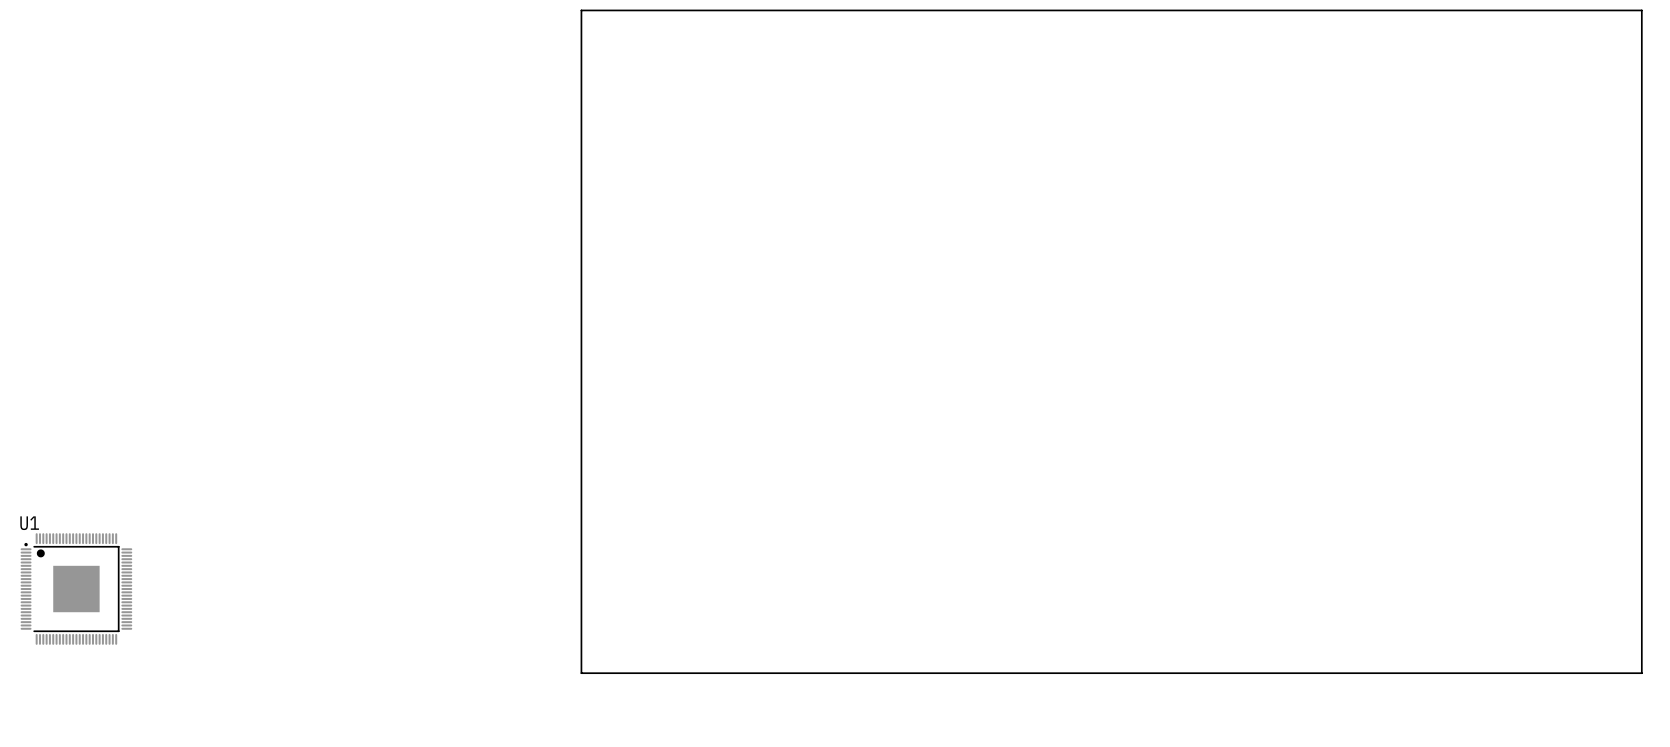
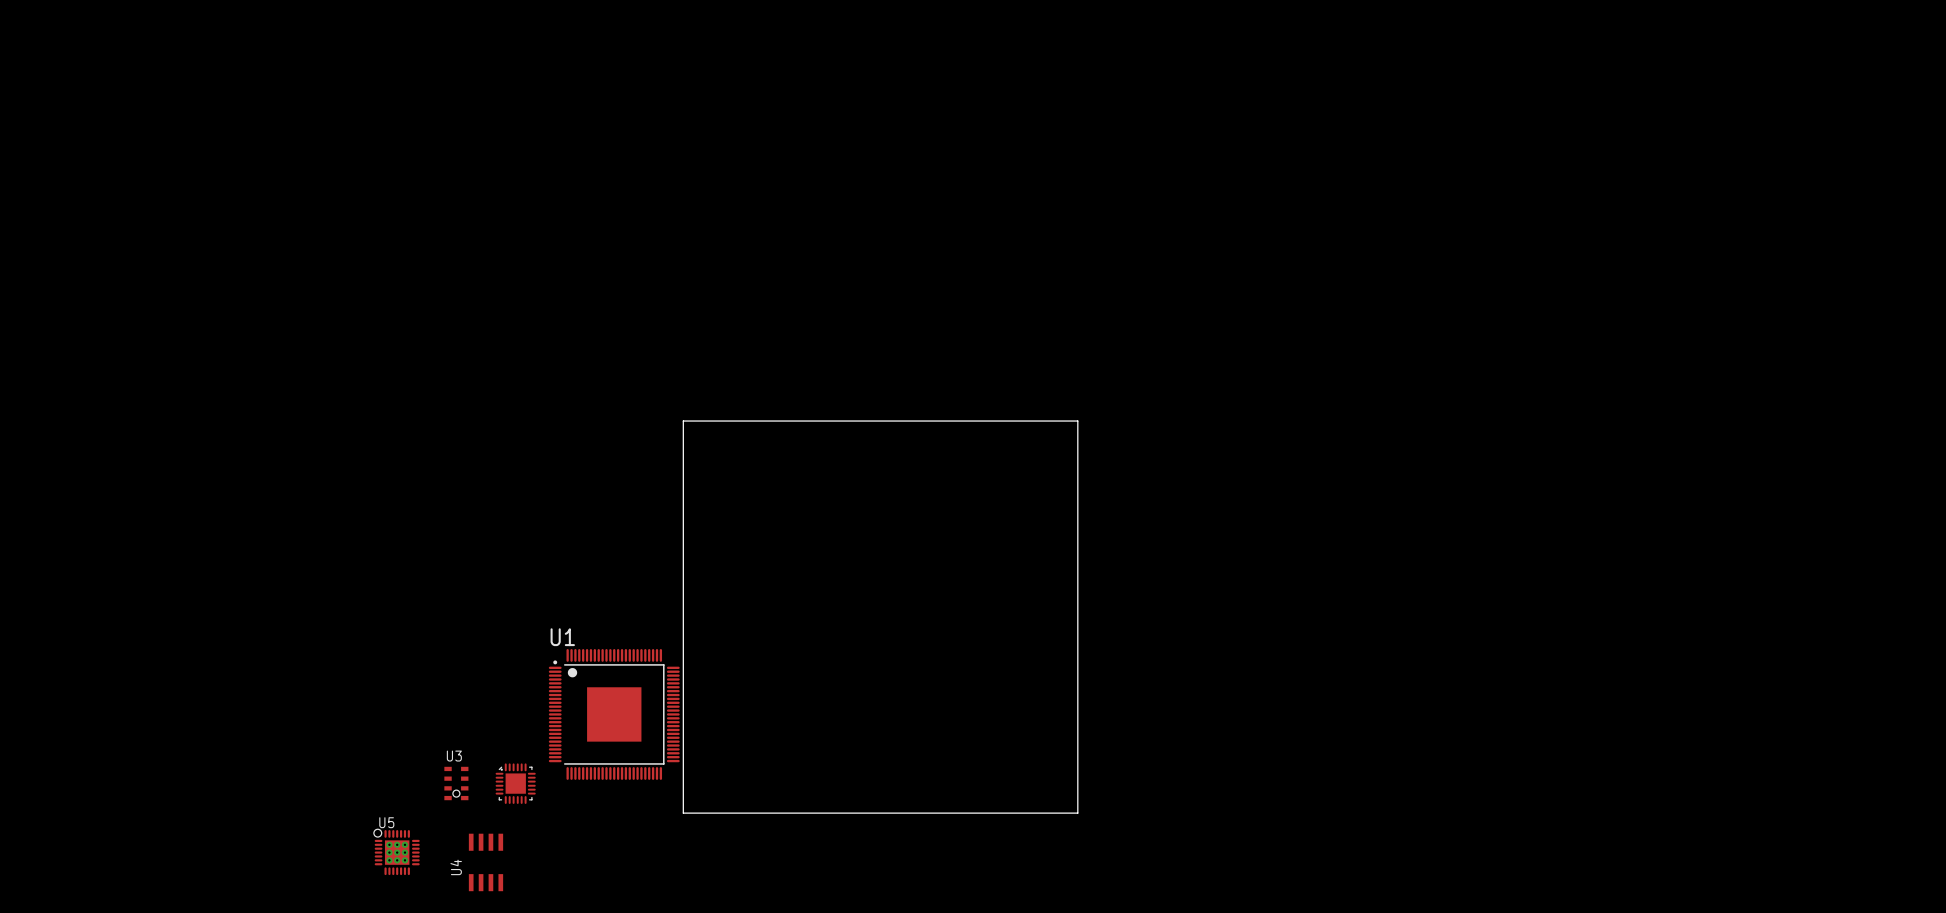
board edge: (581, 338) (581, 10) (1641, 10) (1641, 673) (917, 673) -> (683, 421) (1077, 421) (1077, 813)
U1 position: (76, 589) -> (614, 714)
U3: none -> (456, 783)
part: none -> (515, 783)
U5: none -> (396, 851)
U4: none -> (485, 862)

